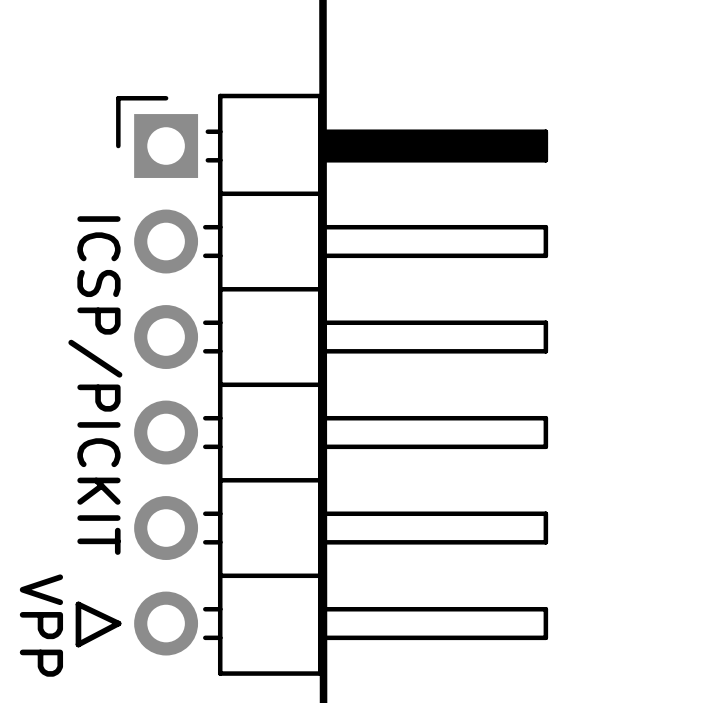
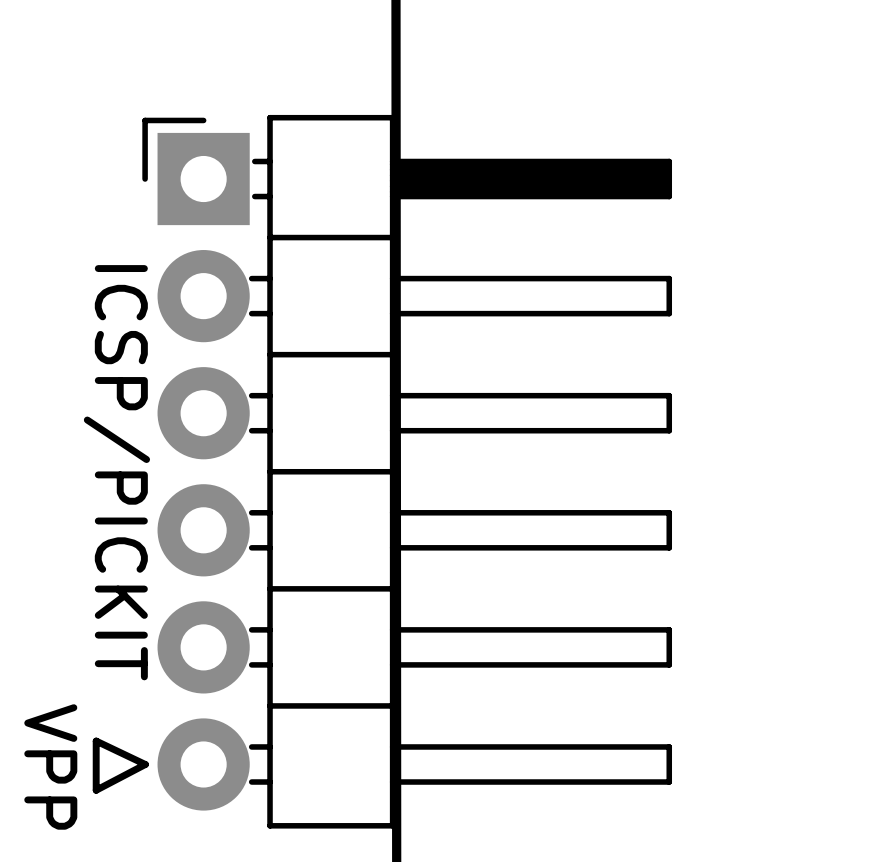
part footprint: [116, 93, 549, 676] -> [142, 114, 673, 829]

